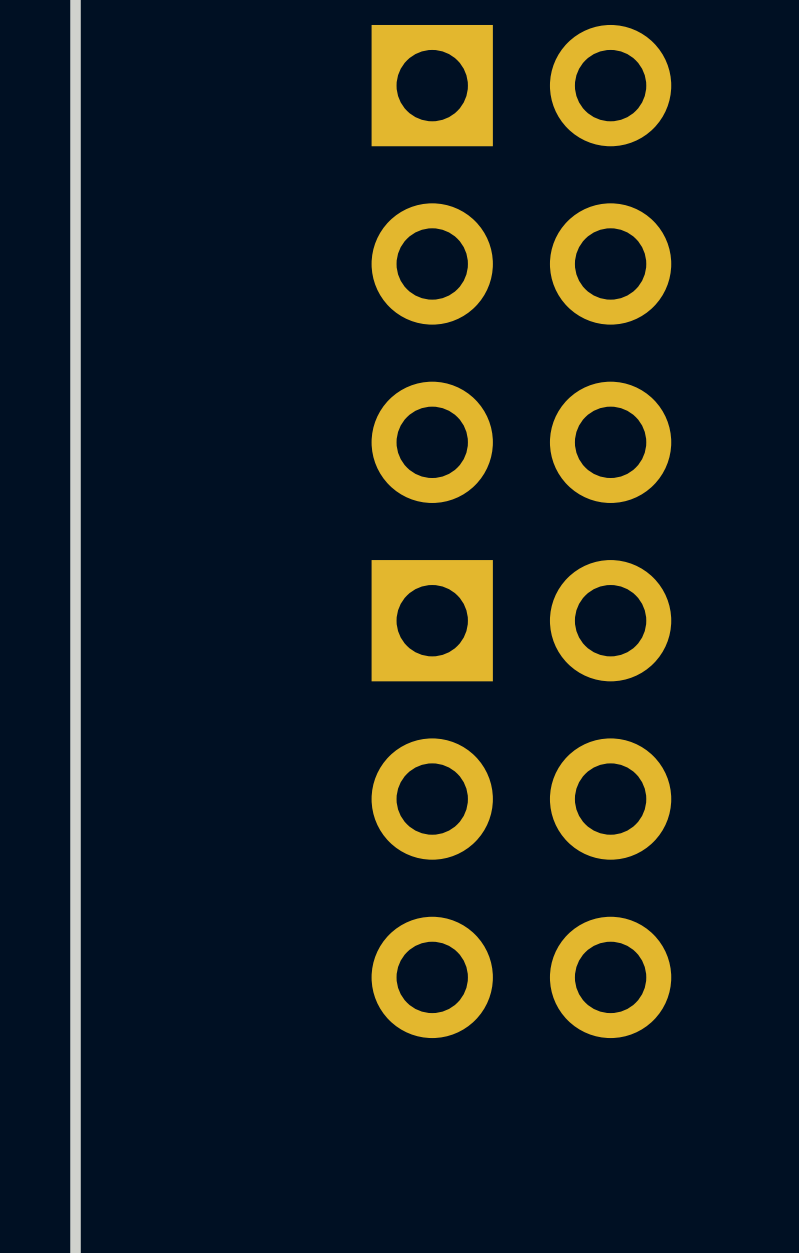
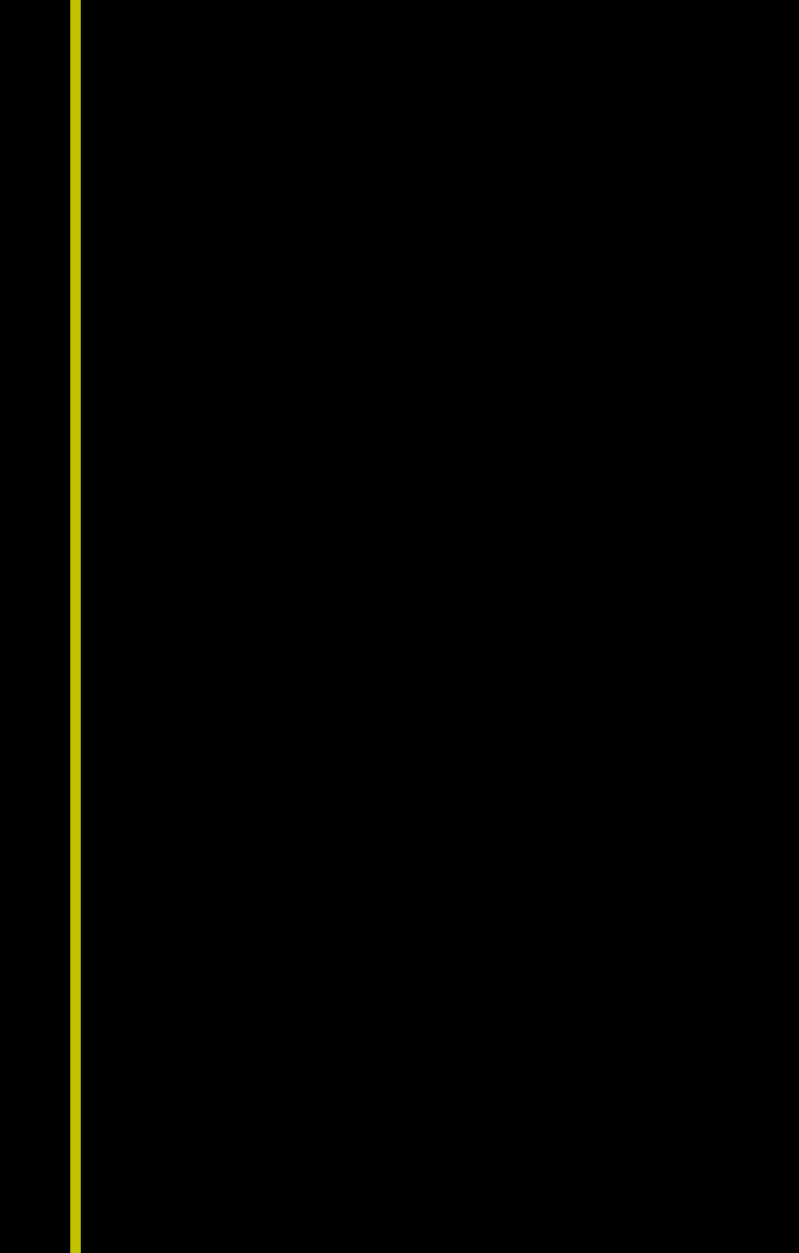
part: (521, 263) -> none
part: (521, 799) -> none

